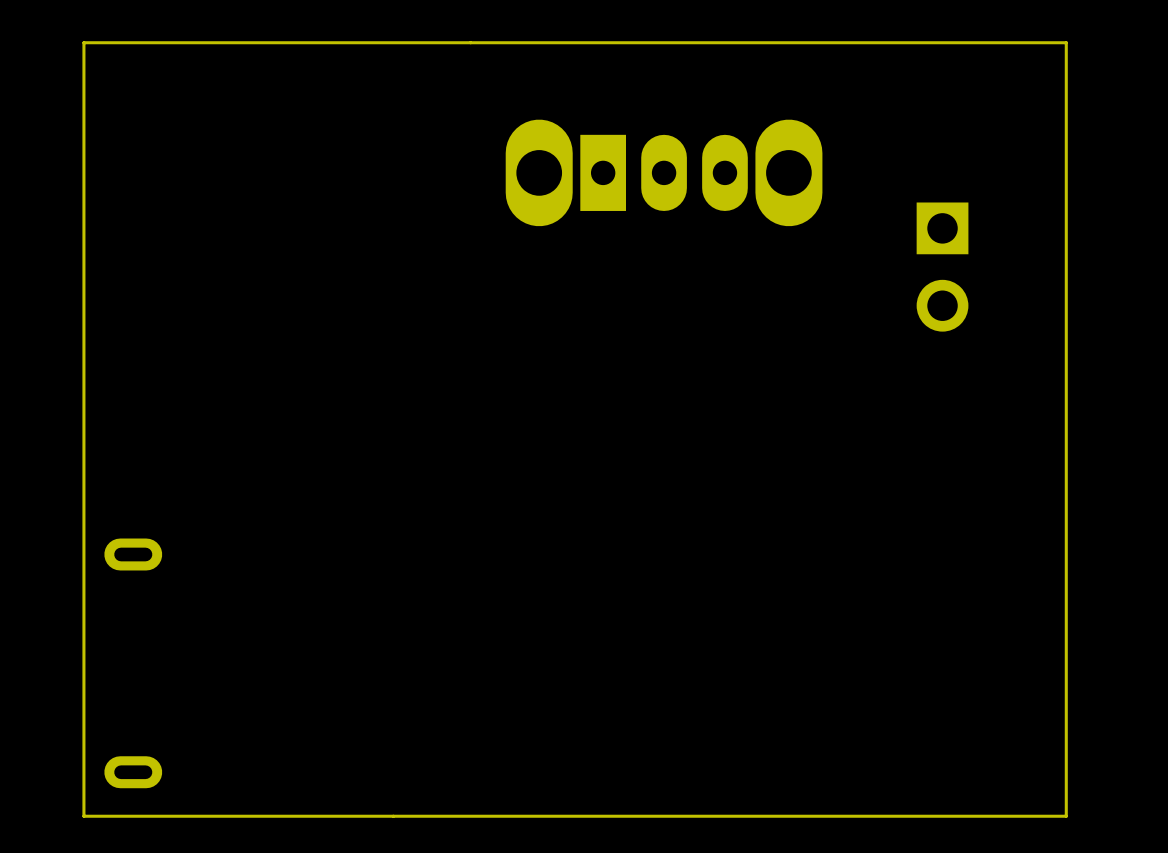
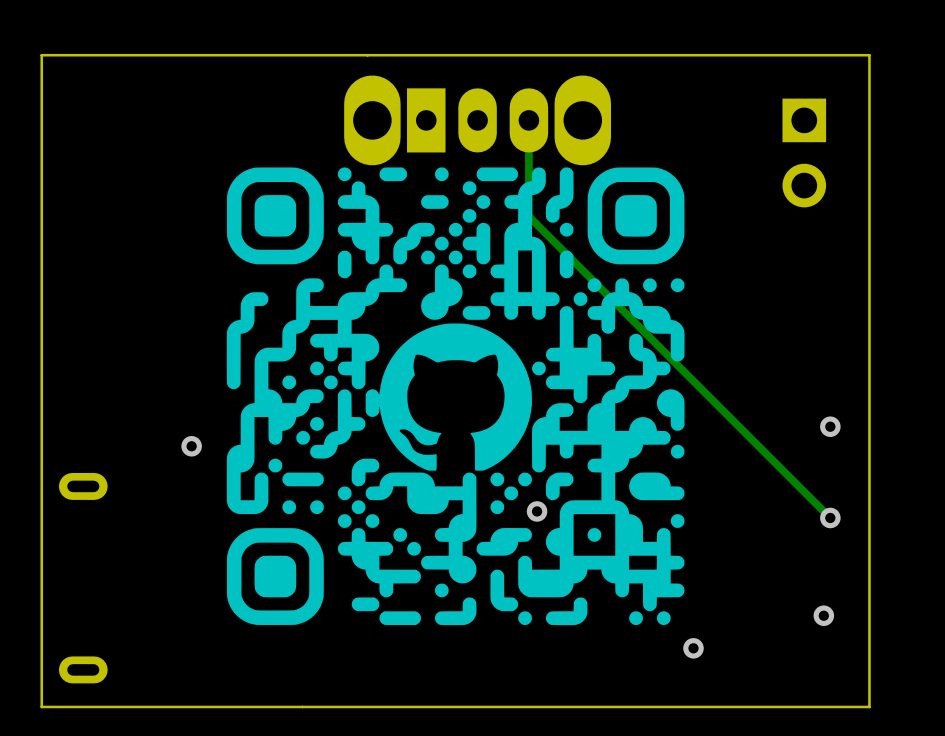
part: none -> (477, 120)
track: none -> (528, 120) (528, 216) (830, 517)
part: (664, 172) -> none
drawing: none -> [226, 167, 685, 626]
part position: (942, 267) -> (804, 152)
via: none -> (830, 426)
via: none -> (191, 446)
via: none -> (537, 511)
via: none -> (830, 517)
via: none -> (823, 615)
via: none -> (693, 648)

